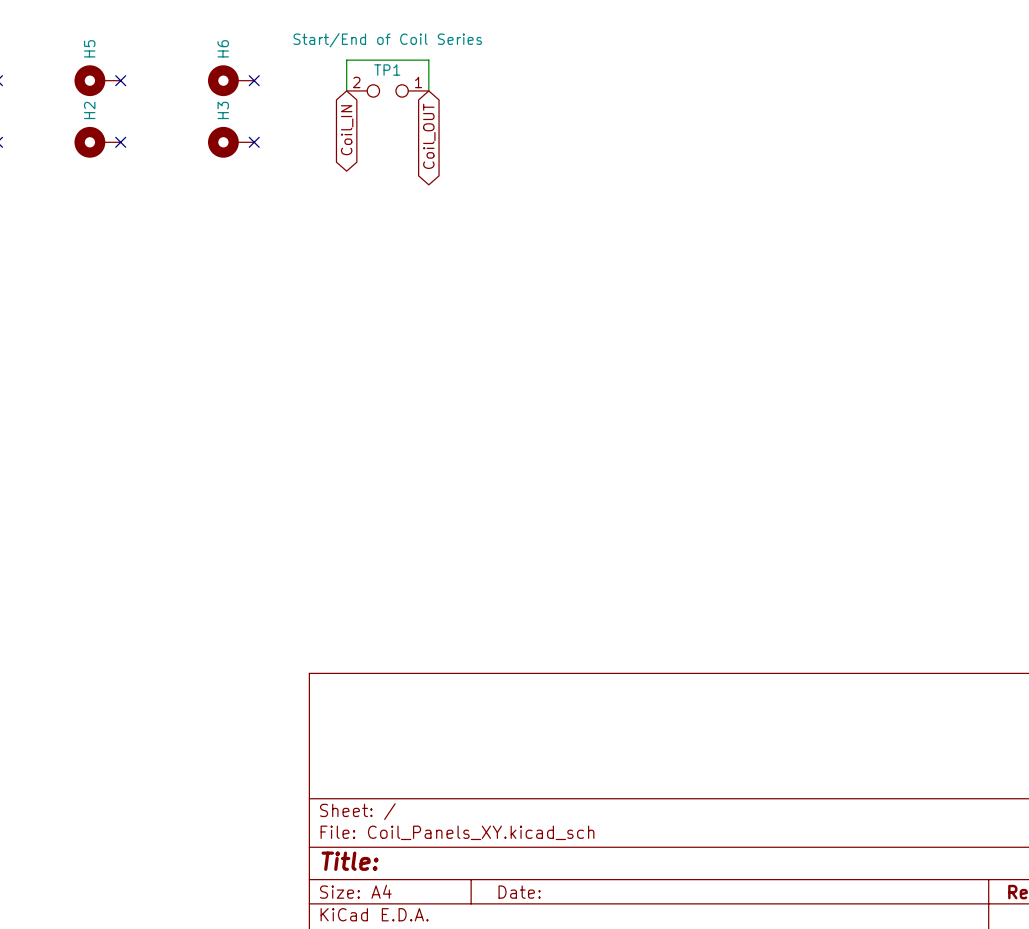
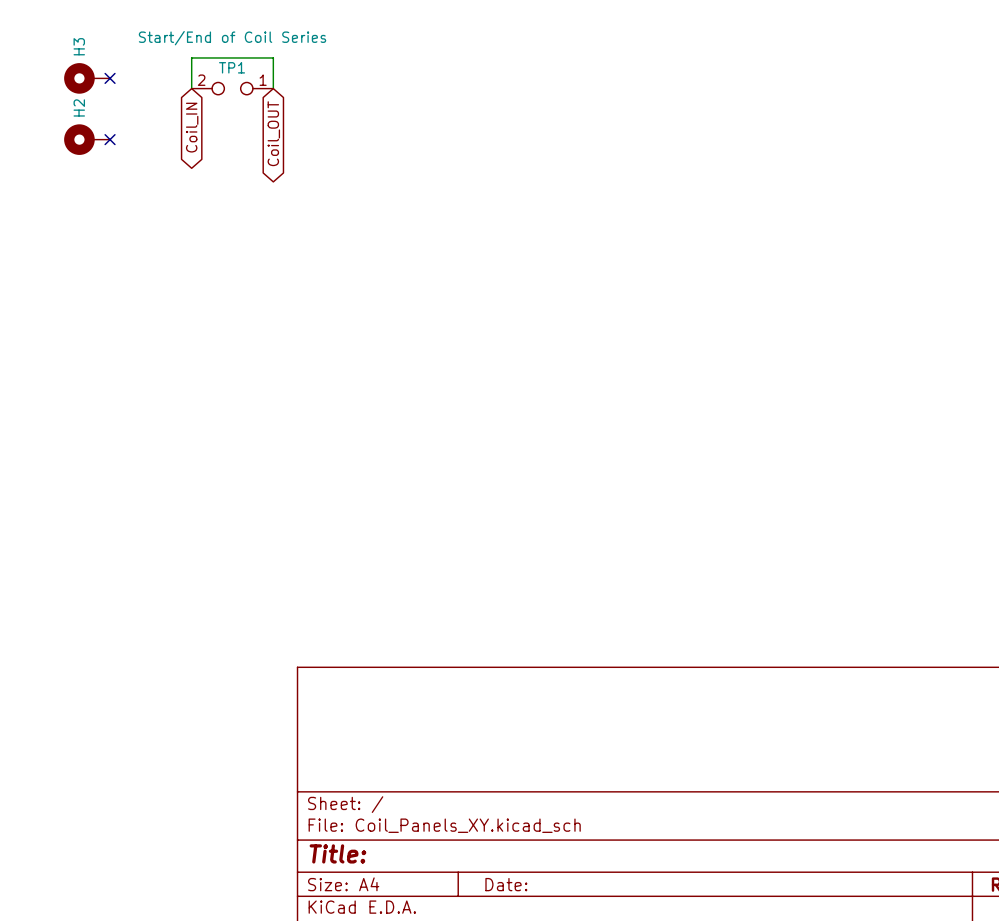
H5 name: H5 (89, 48) -> H3 (79, 46)
H6: (231, 80) -> none
no-connect mark: (254, 80) -> none
wire: (346, 90) (346, 60) (428, 60) (428, 90) -> (191, 88) (191, 57) (273, 57) (273, 88)
TP1 position: (387, 90) -> (232, 88)
global label position: Coil_IN (347, 130) -> Coil_IN (192, 127)
global label position: Coil_OUT (429, 136) -> Coil_OUT (273, 133)
H3: (231, 142) -> none
no-connect mark: (254, 142) -> none

